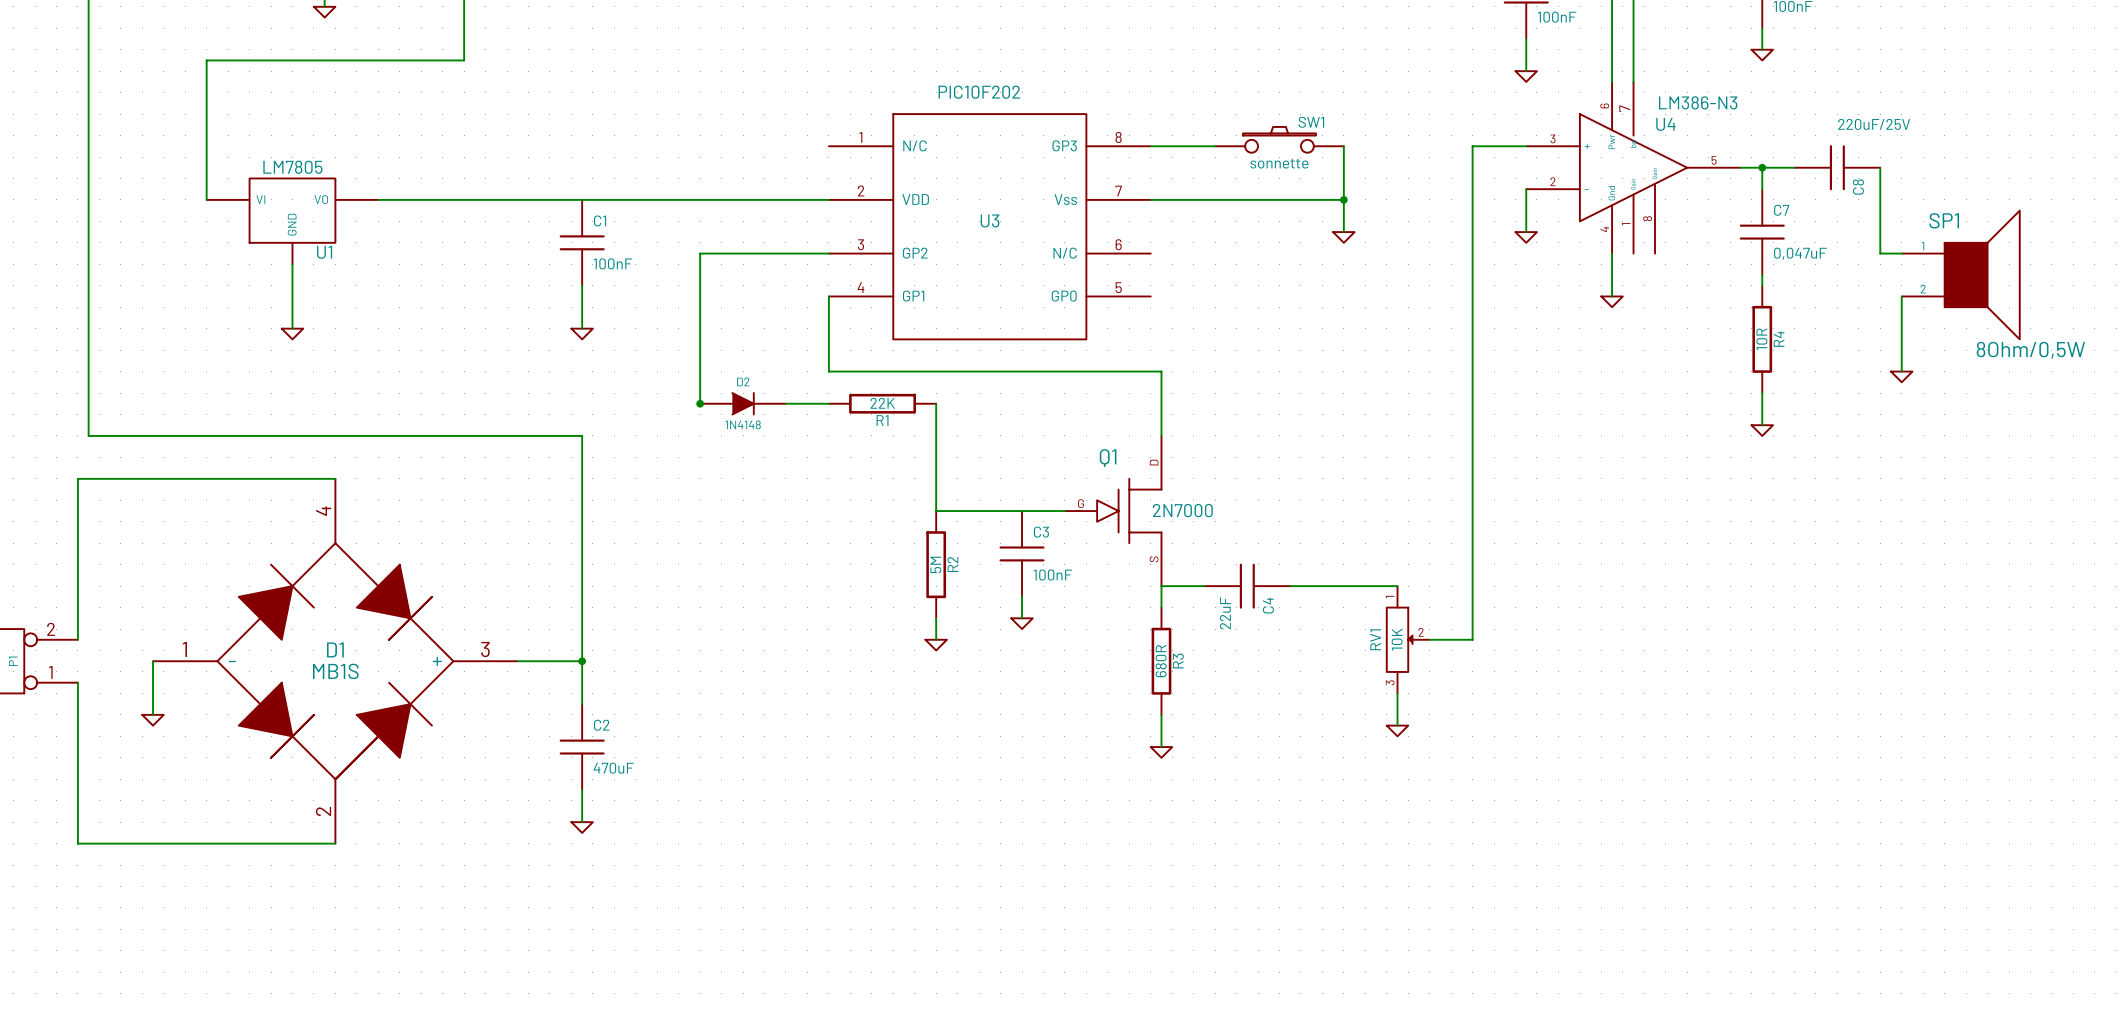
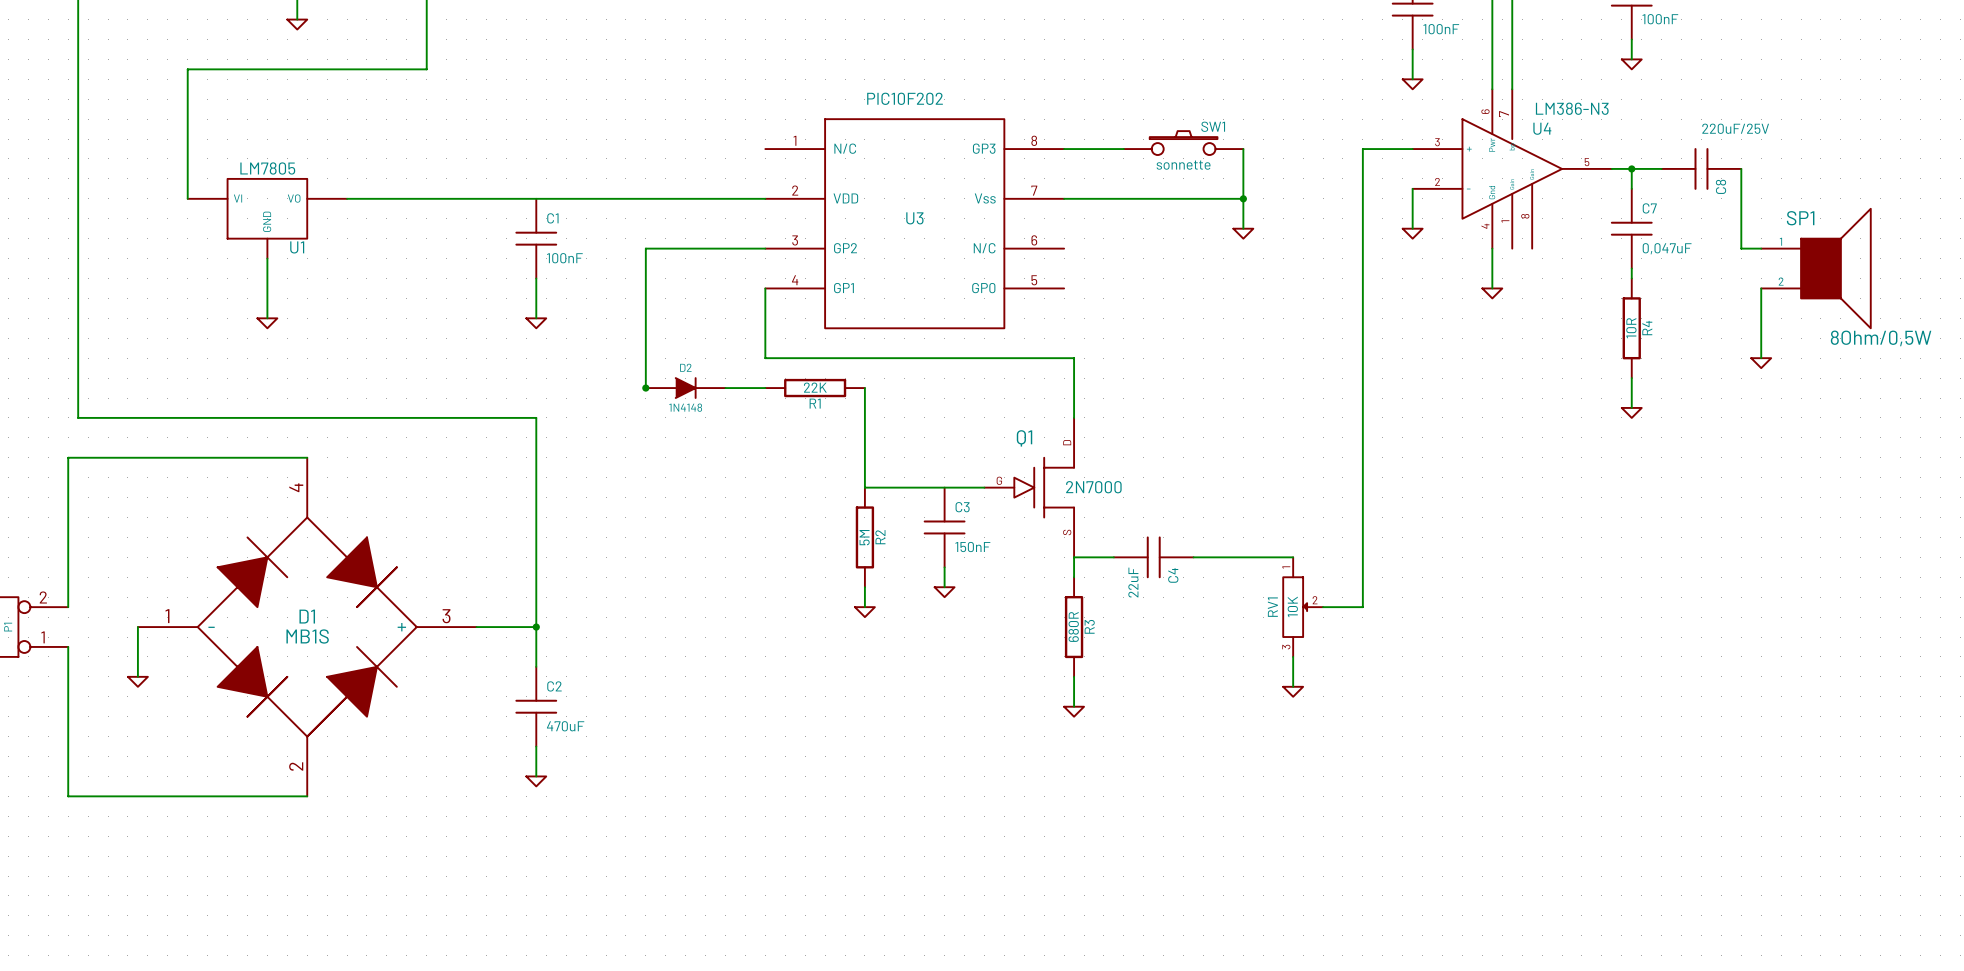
C3 value: 100nF (1052, 575) -> 150nF (972, 547)

